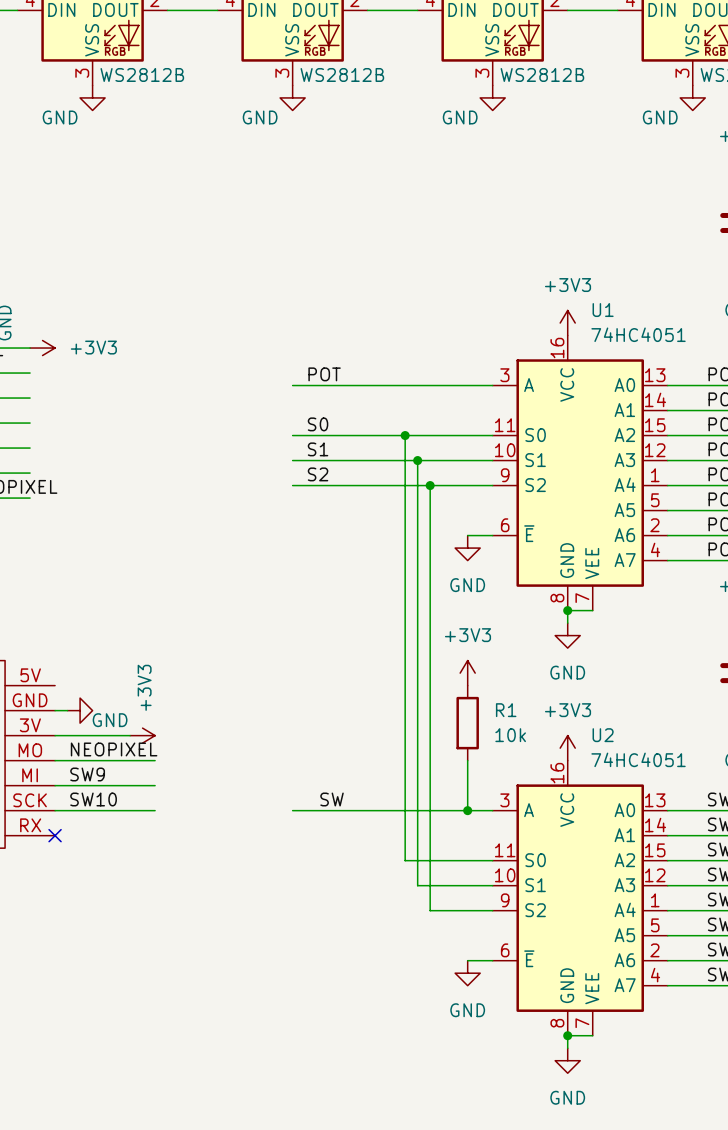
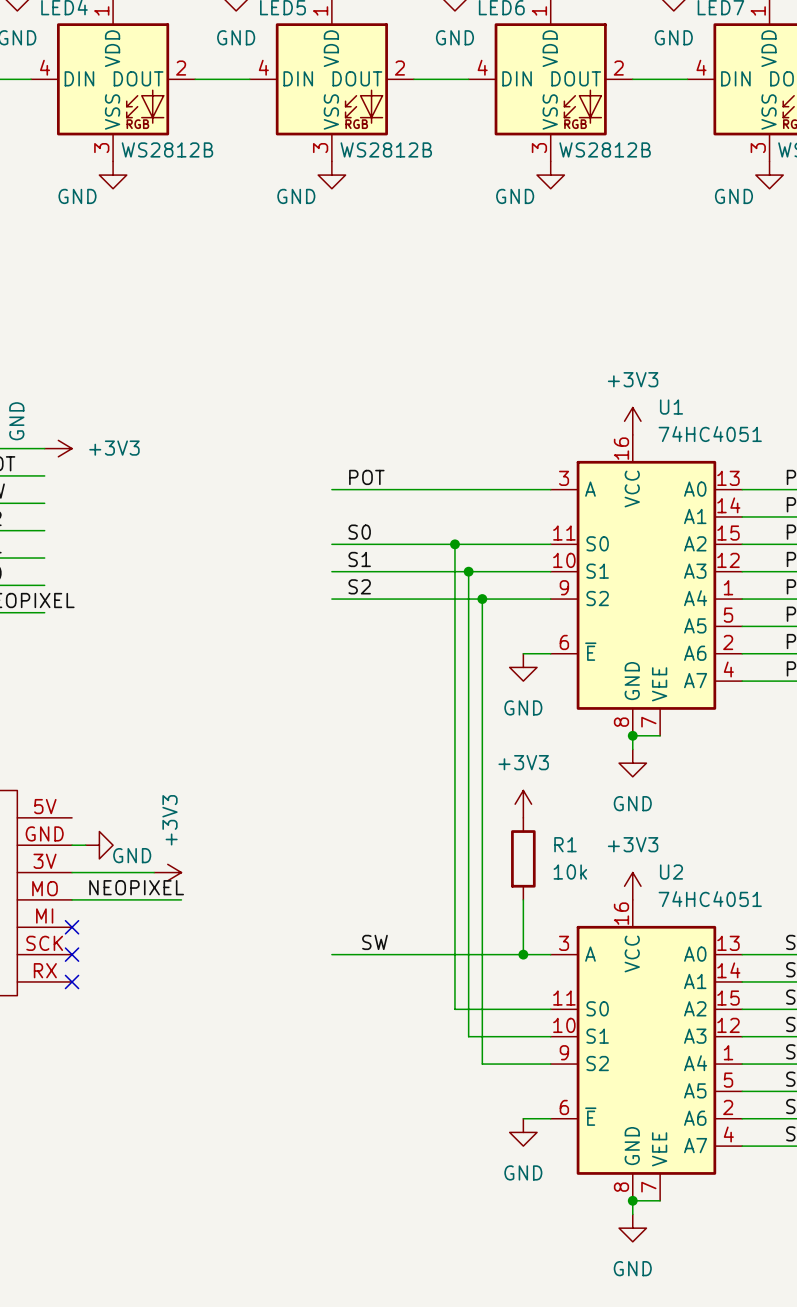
label: SW9 (87, 774) -> none
wire: (55, 785) (155, 785) -> none
no-connect mark: none -> (72, 927)
label: SW10 (93, 799) -> none
wire: (55, 810) (155, 810) -> none
no-connect mark: none -> (72, 954)

